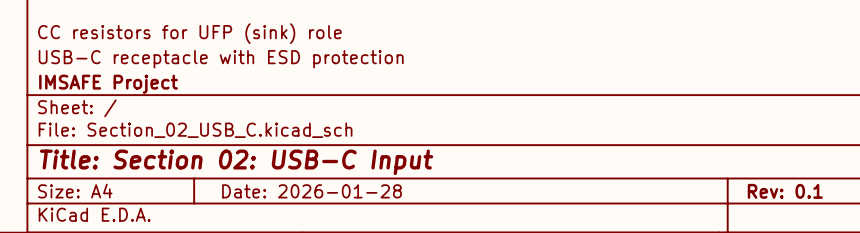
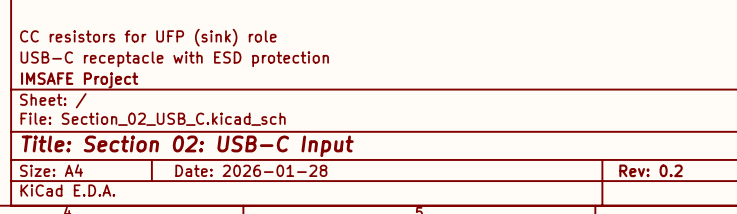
title block: Rev: 0.1 (785, 191) -> Rev: 0.2 (651, 170)

